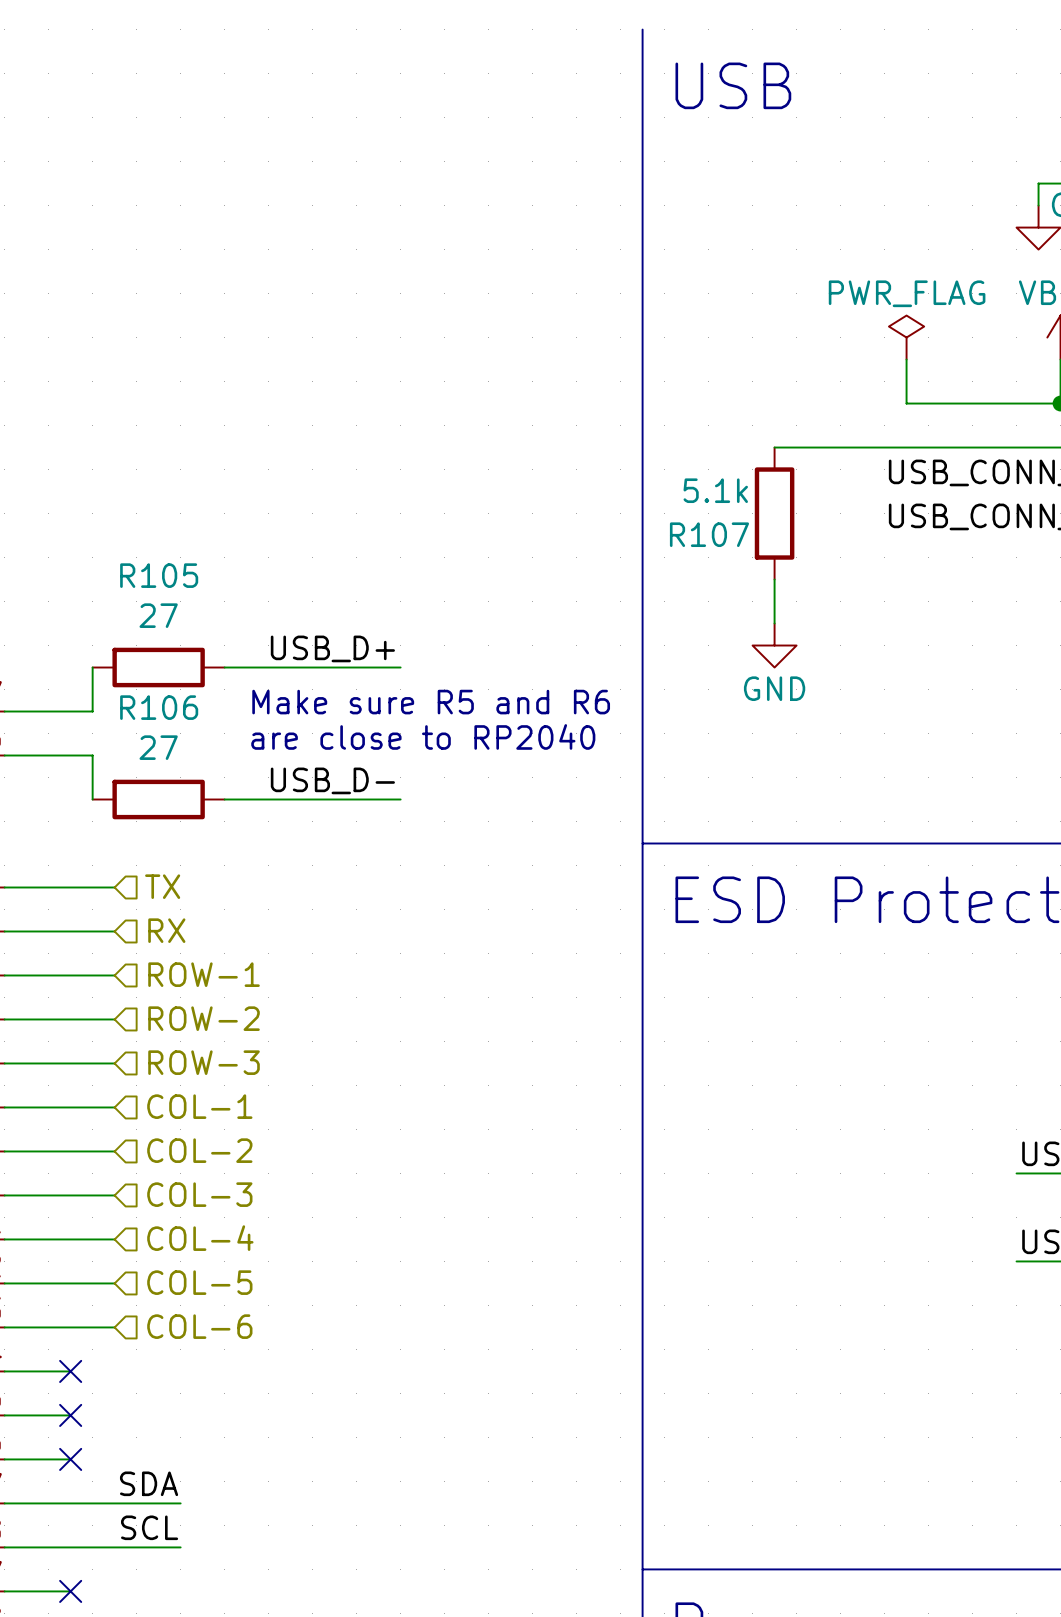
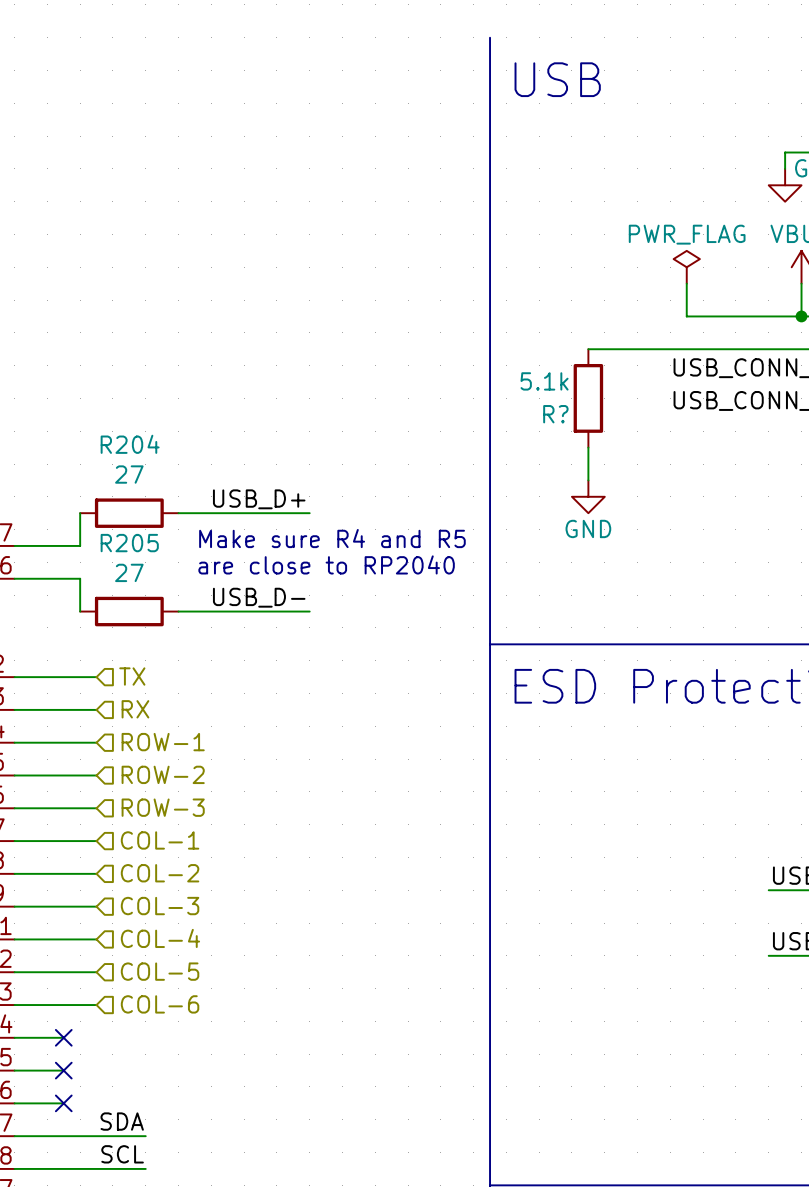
R107 name: R107 (709, 534) -> R? (555, 414)
R105 name: R105 (159, 575) -> R204 (130, 444)
text: Make sure R5 and R6 (431, 702) -> Make sure R4 and R5 (332, 538)
R106 name: R106 (159, 707) -> R205 (129, 543)

